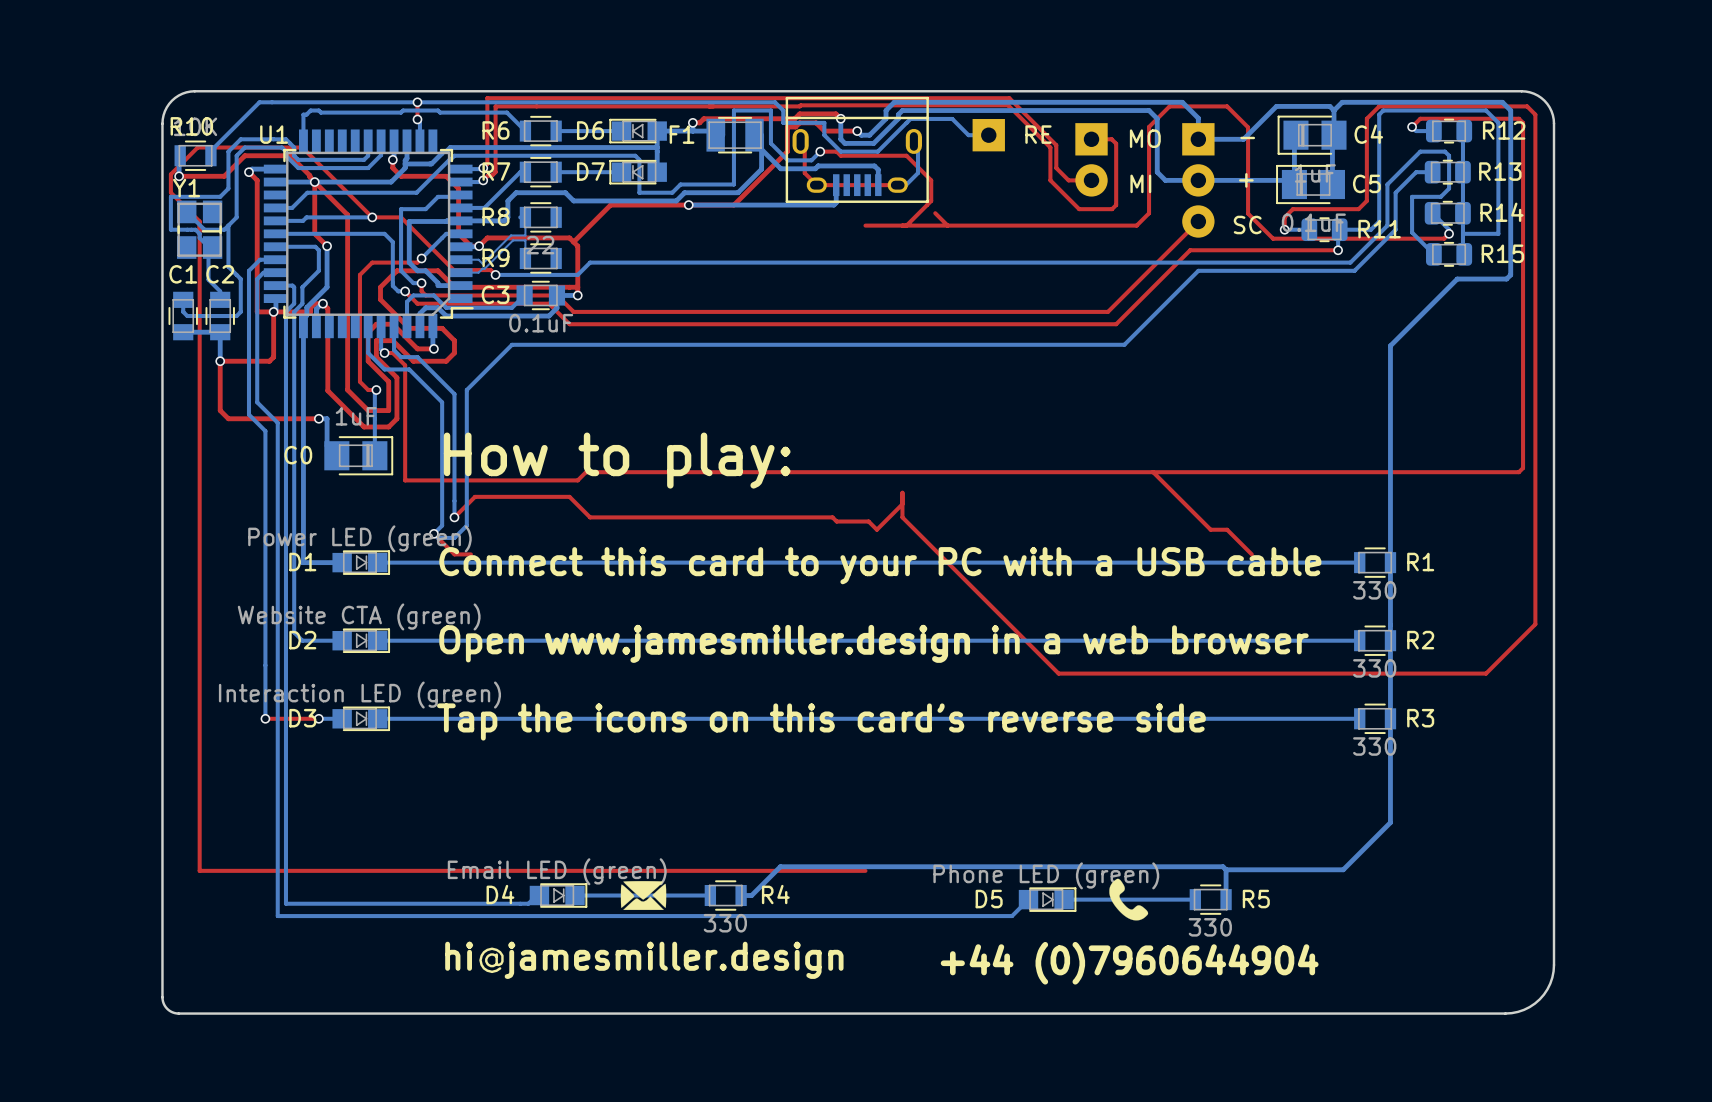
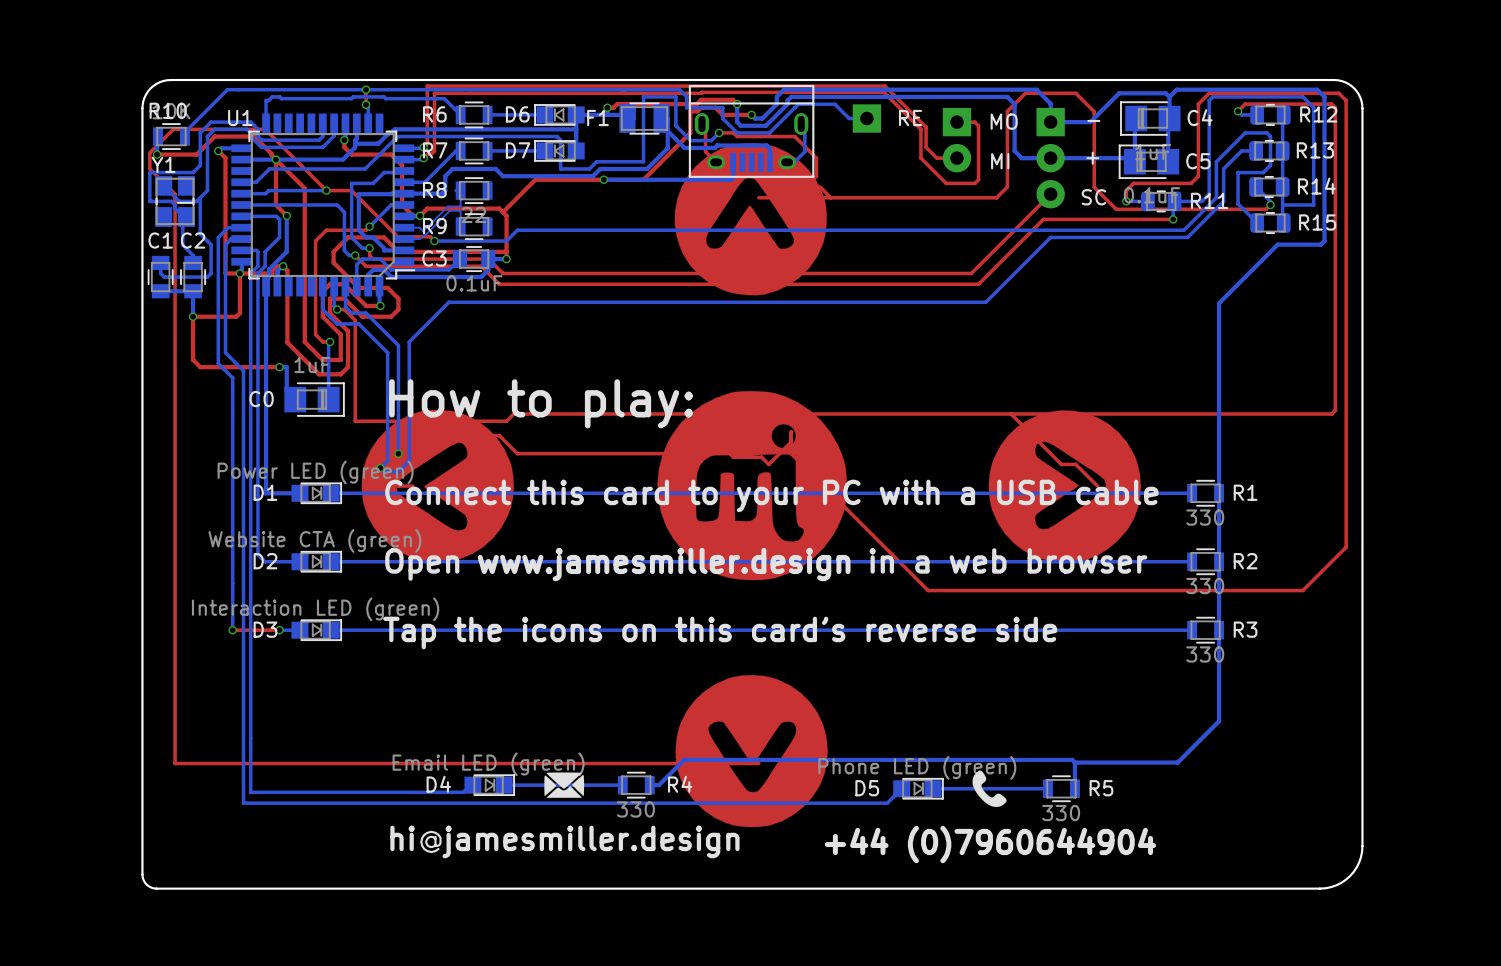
part: none -> (750, 219)
part: none -> (752, 485)
part: none -> (437, 486)
part: none -> (1064, 486)
part: none -> (751, 751)

